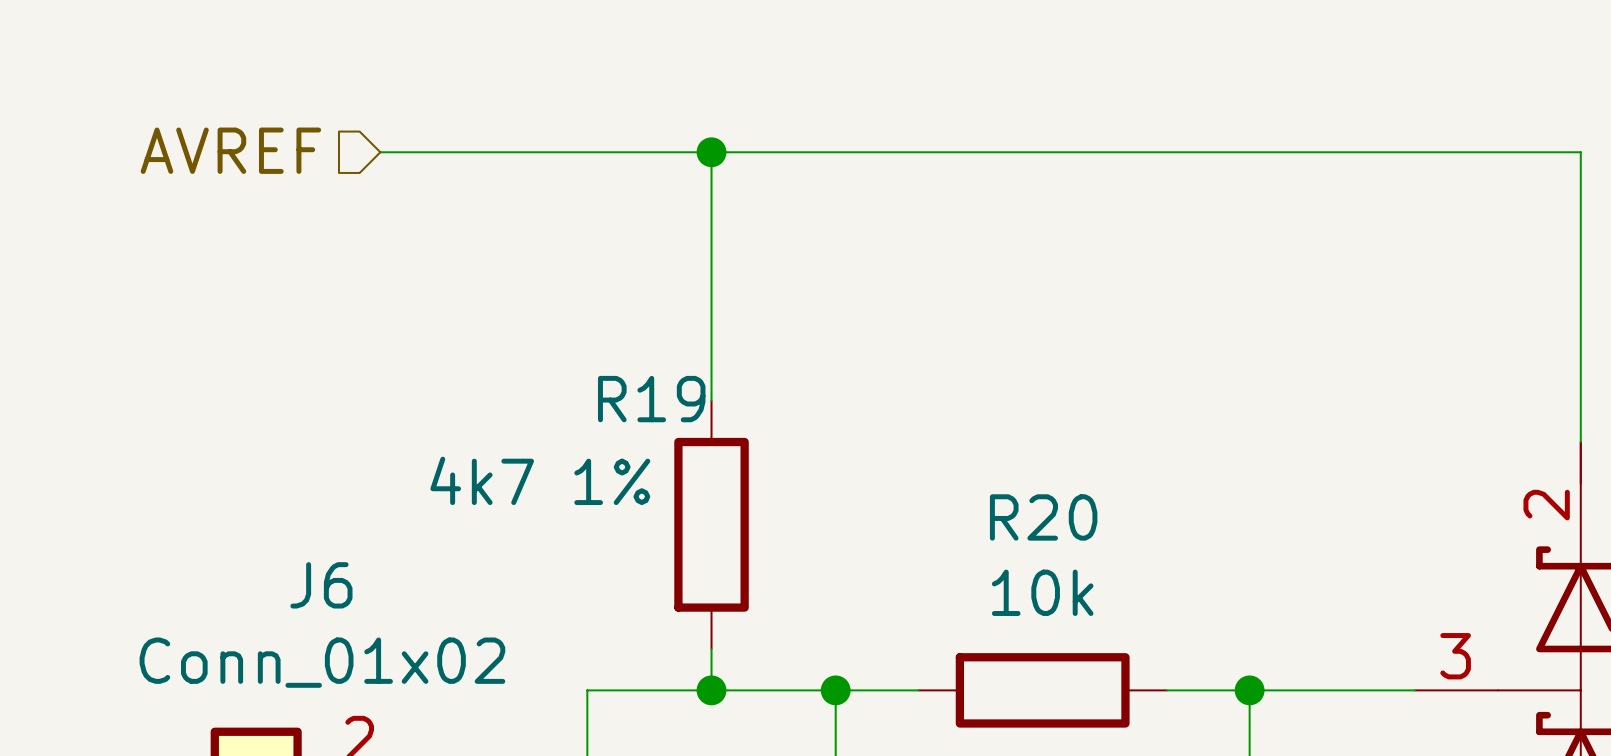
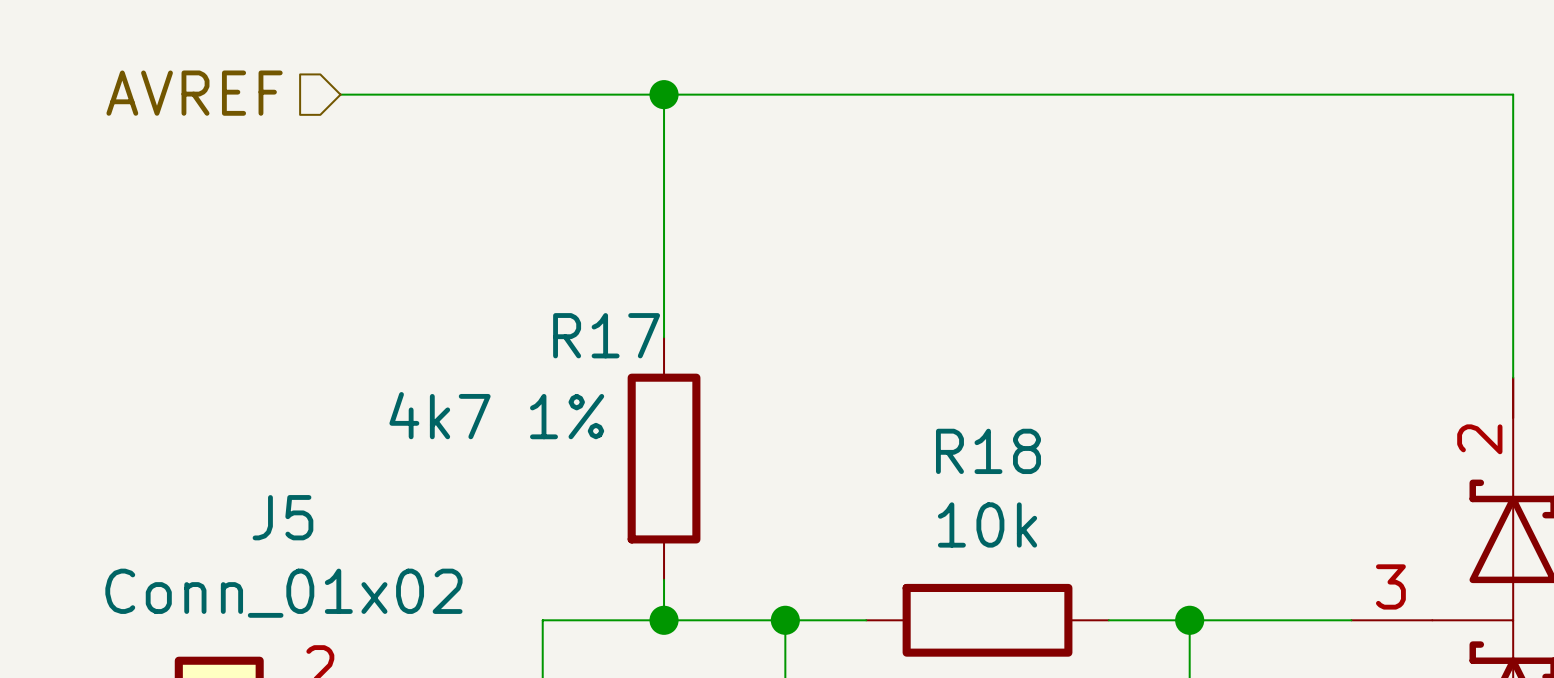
R19 name: R19 (651, 399) -> R17 (606, 335)
R20 name: R20 (1043, 517) -> R18 (988, 451)
J6 name: J6 (321, 585) -> J5 (282, 517)

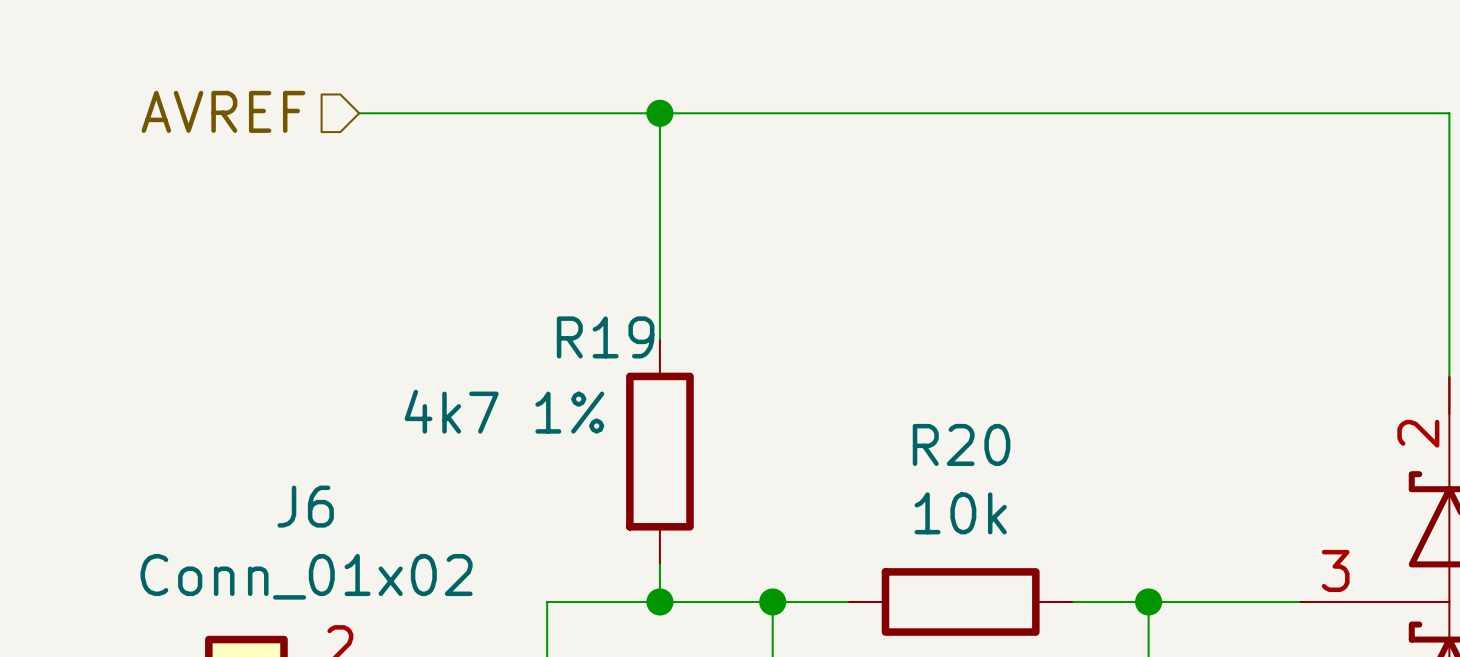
R17 name: R17 (606, 335) -> R19 (605, 337)
R18 name: R18 (988, 451) -> R20 (961, 444)
J5 name: J5 (282, 517) -> J6 (305, 506)

